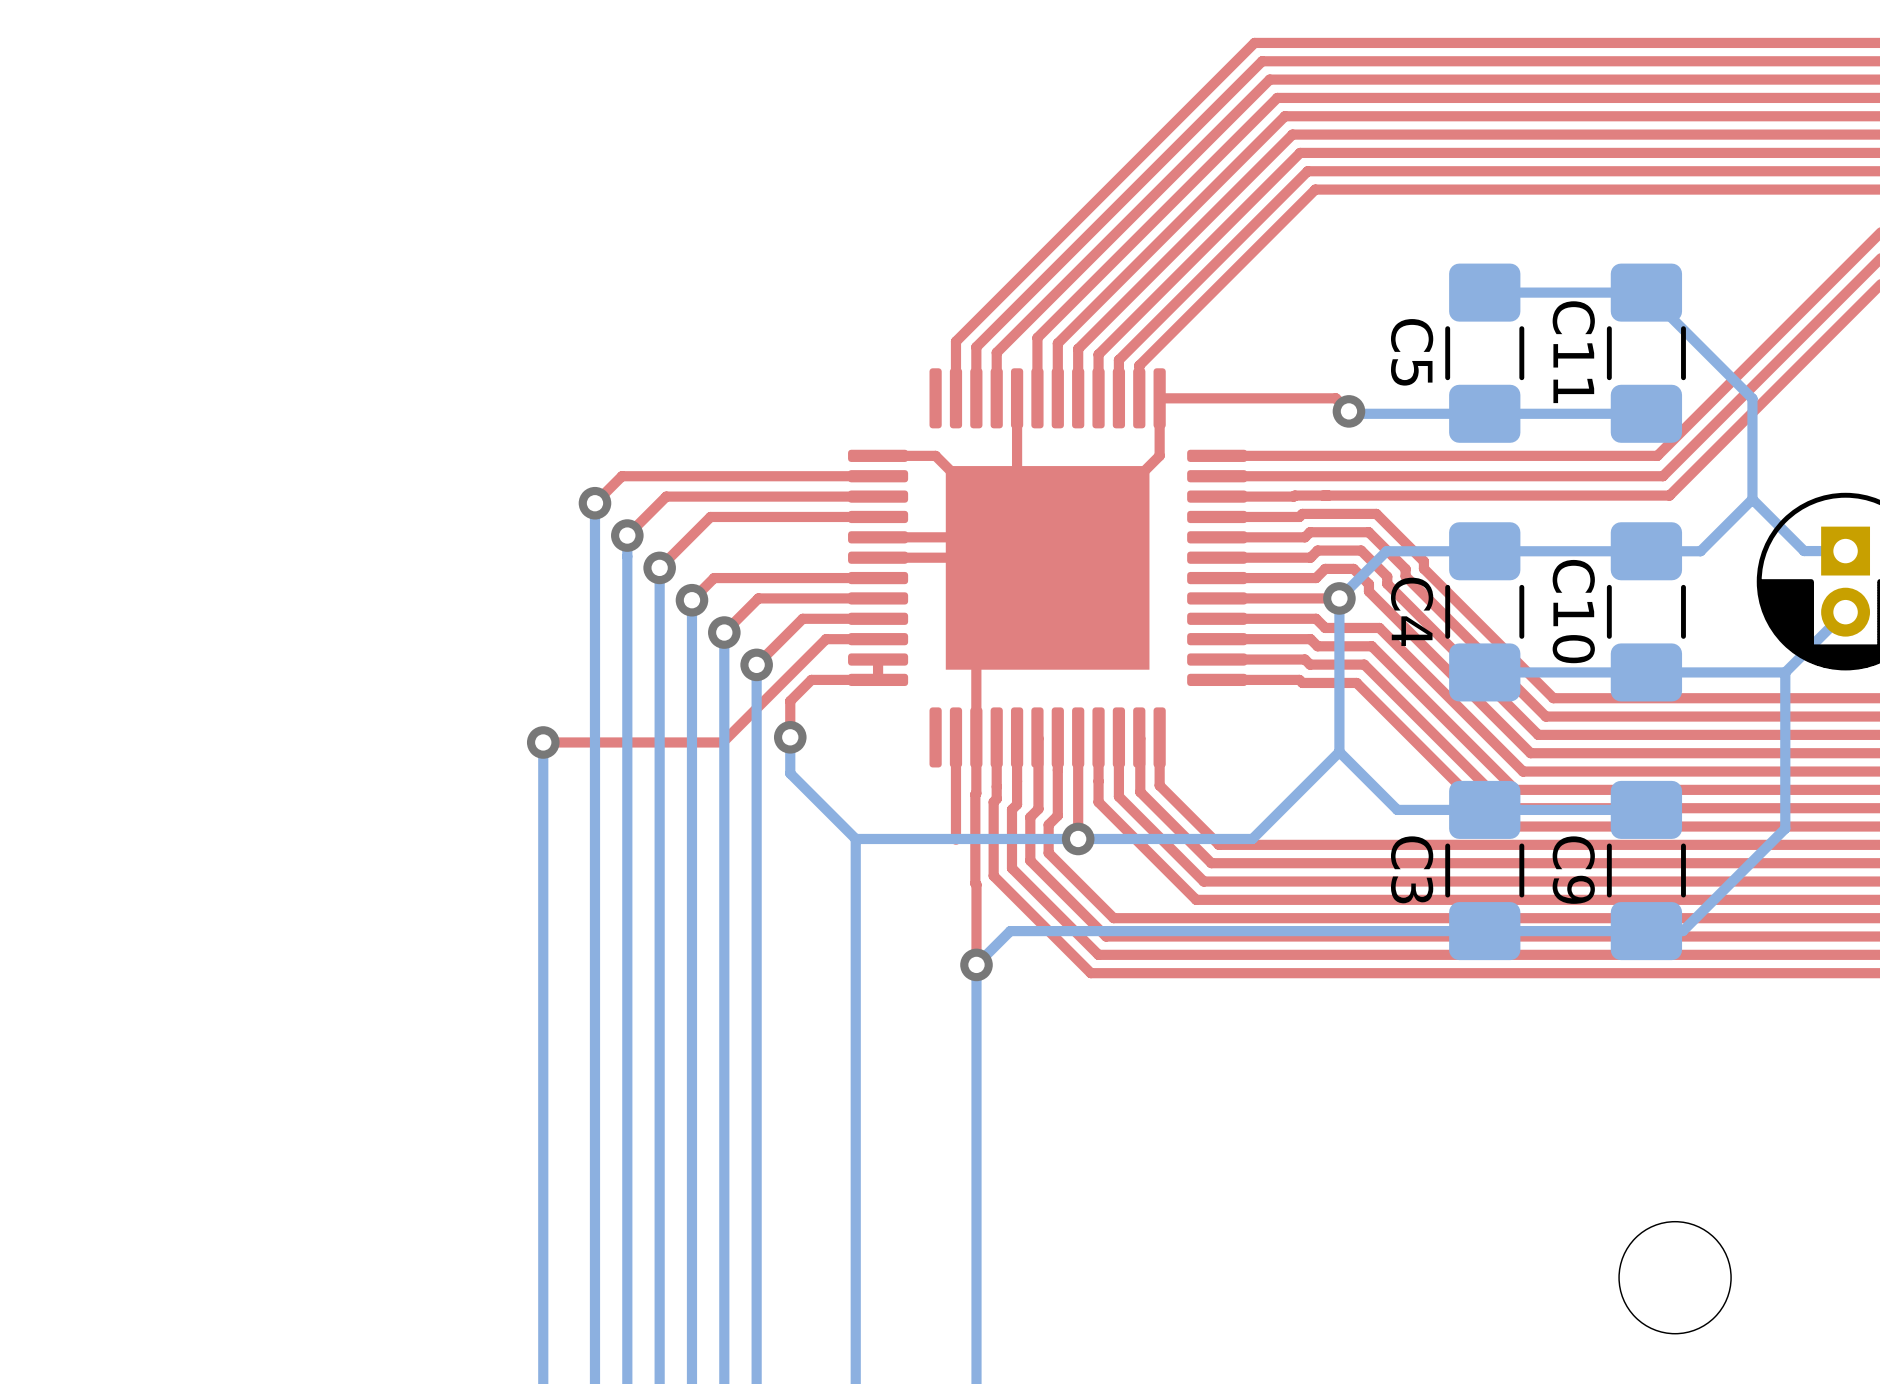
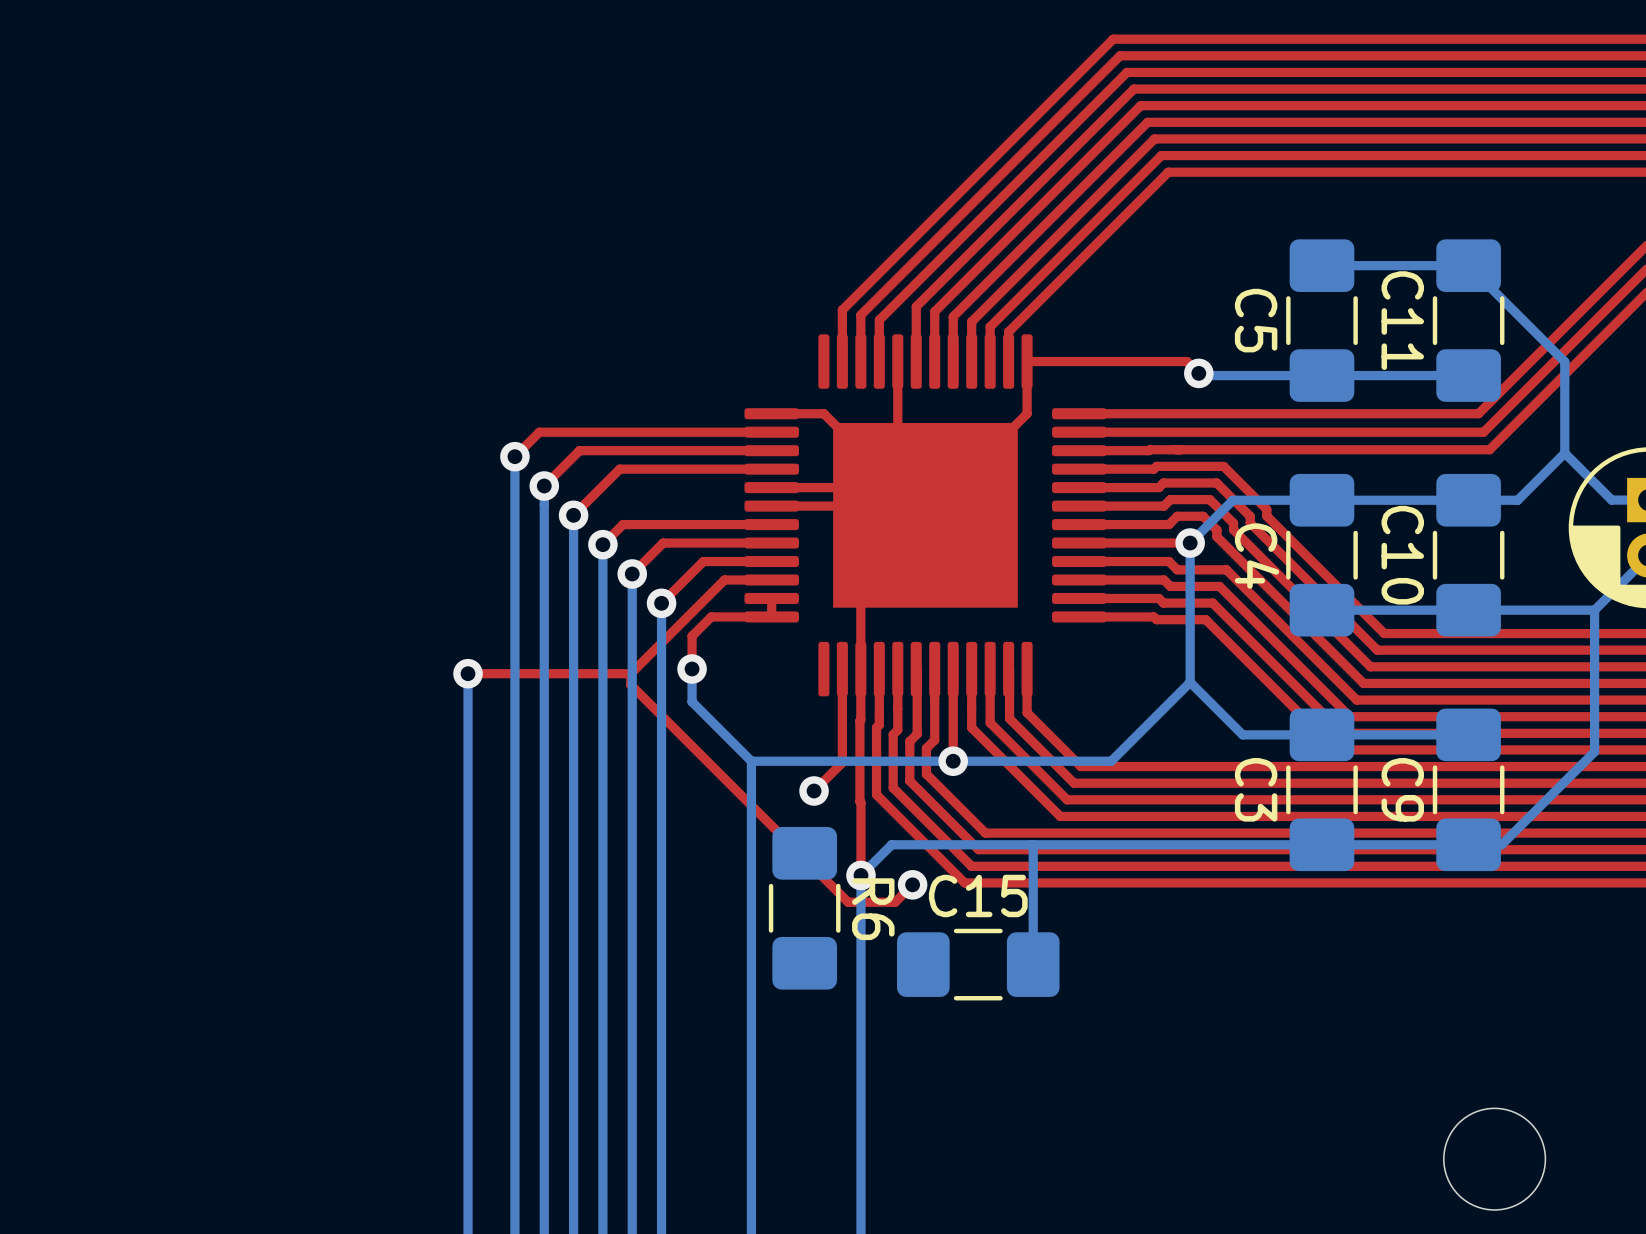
top track: none -> (630, 673) (630, 684) (848, 902) (895, 902) (912, 884)
top track: none -> (842, 761) (814, 791)
via: none -> (814, 791)
bottom track: none -> (1032, 844) (1033, 964)
via: none -> (912, 884)
R6: none -> (804, 908)
C15: none -> (978, 964)

